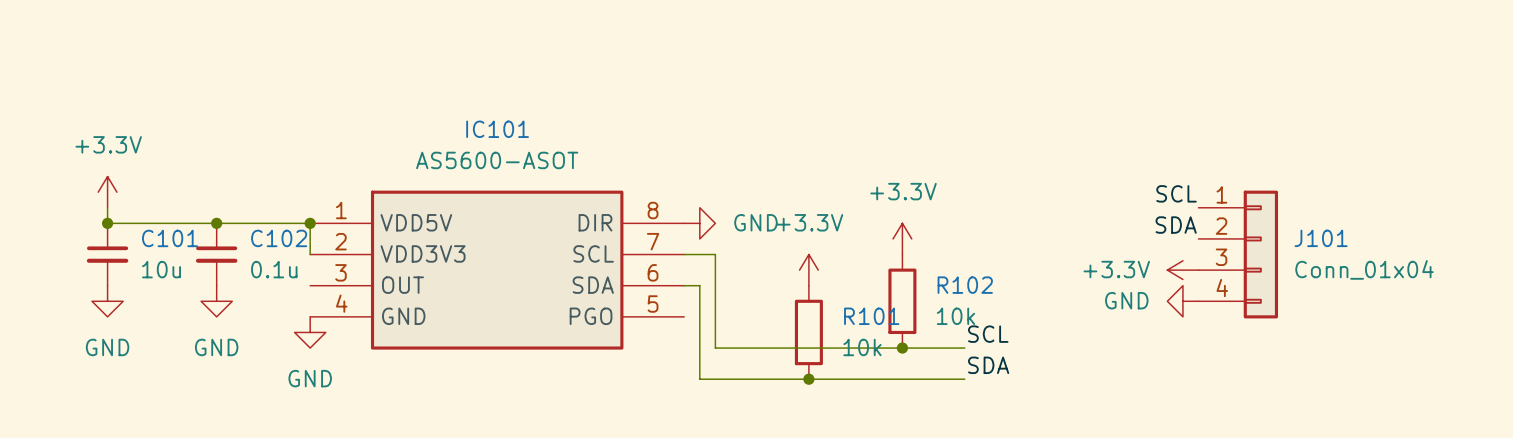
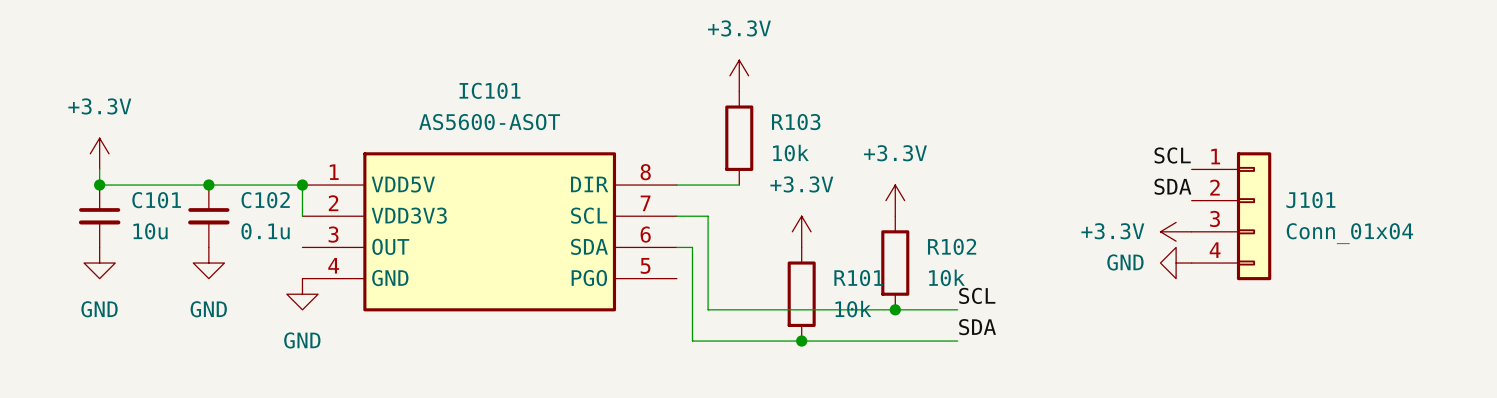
power symbol: none -> +3.3V (739, 75)
R103: none -> 10k (739, 138)
wire: none -> (676, 185) (739, 185)
power symbol: GND (699, 223) -> none

